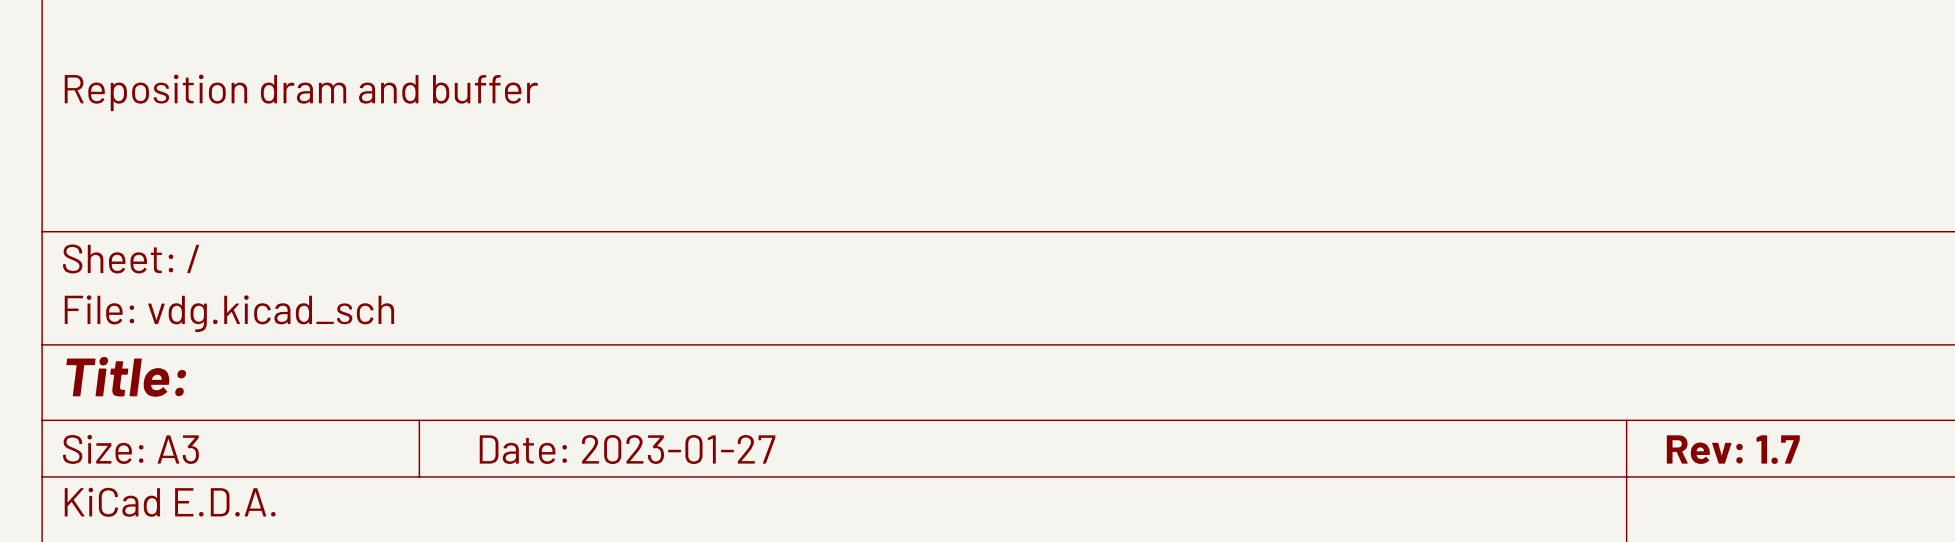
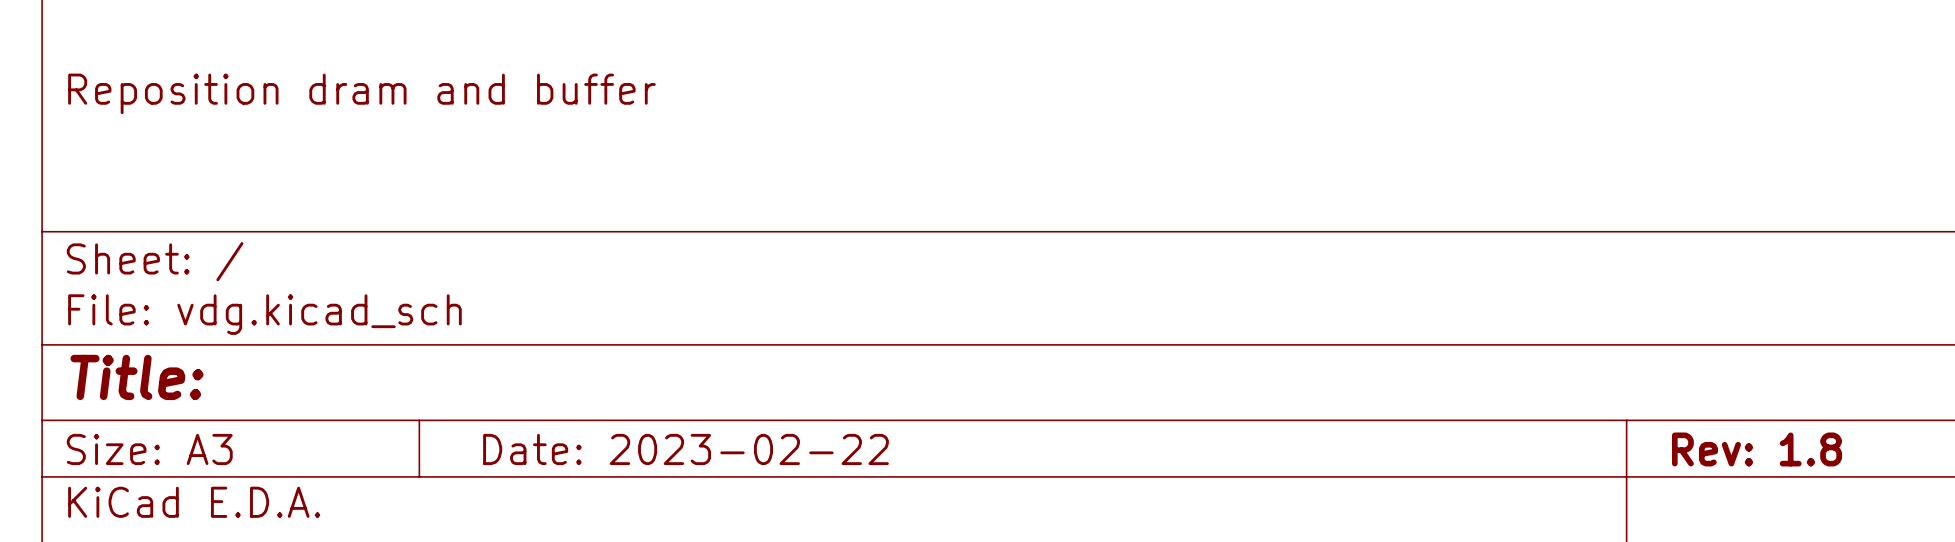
title block: Date: 2023-01-27 (627, 449) -> Date: 2023-02-22 (686, 449)
title block: Rev: 1.7 (1733, 449) -> Rev: 1.8 (1757, 449)

